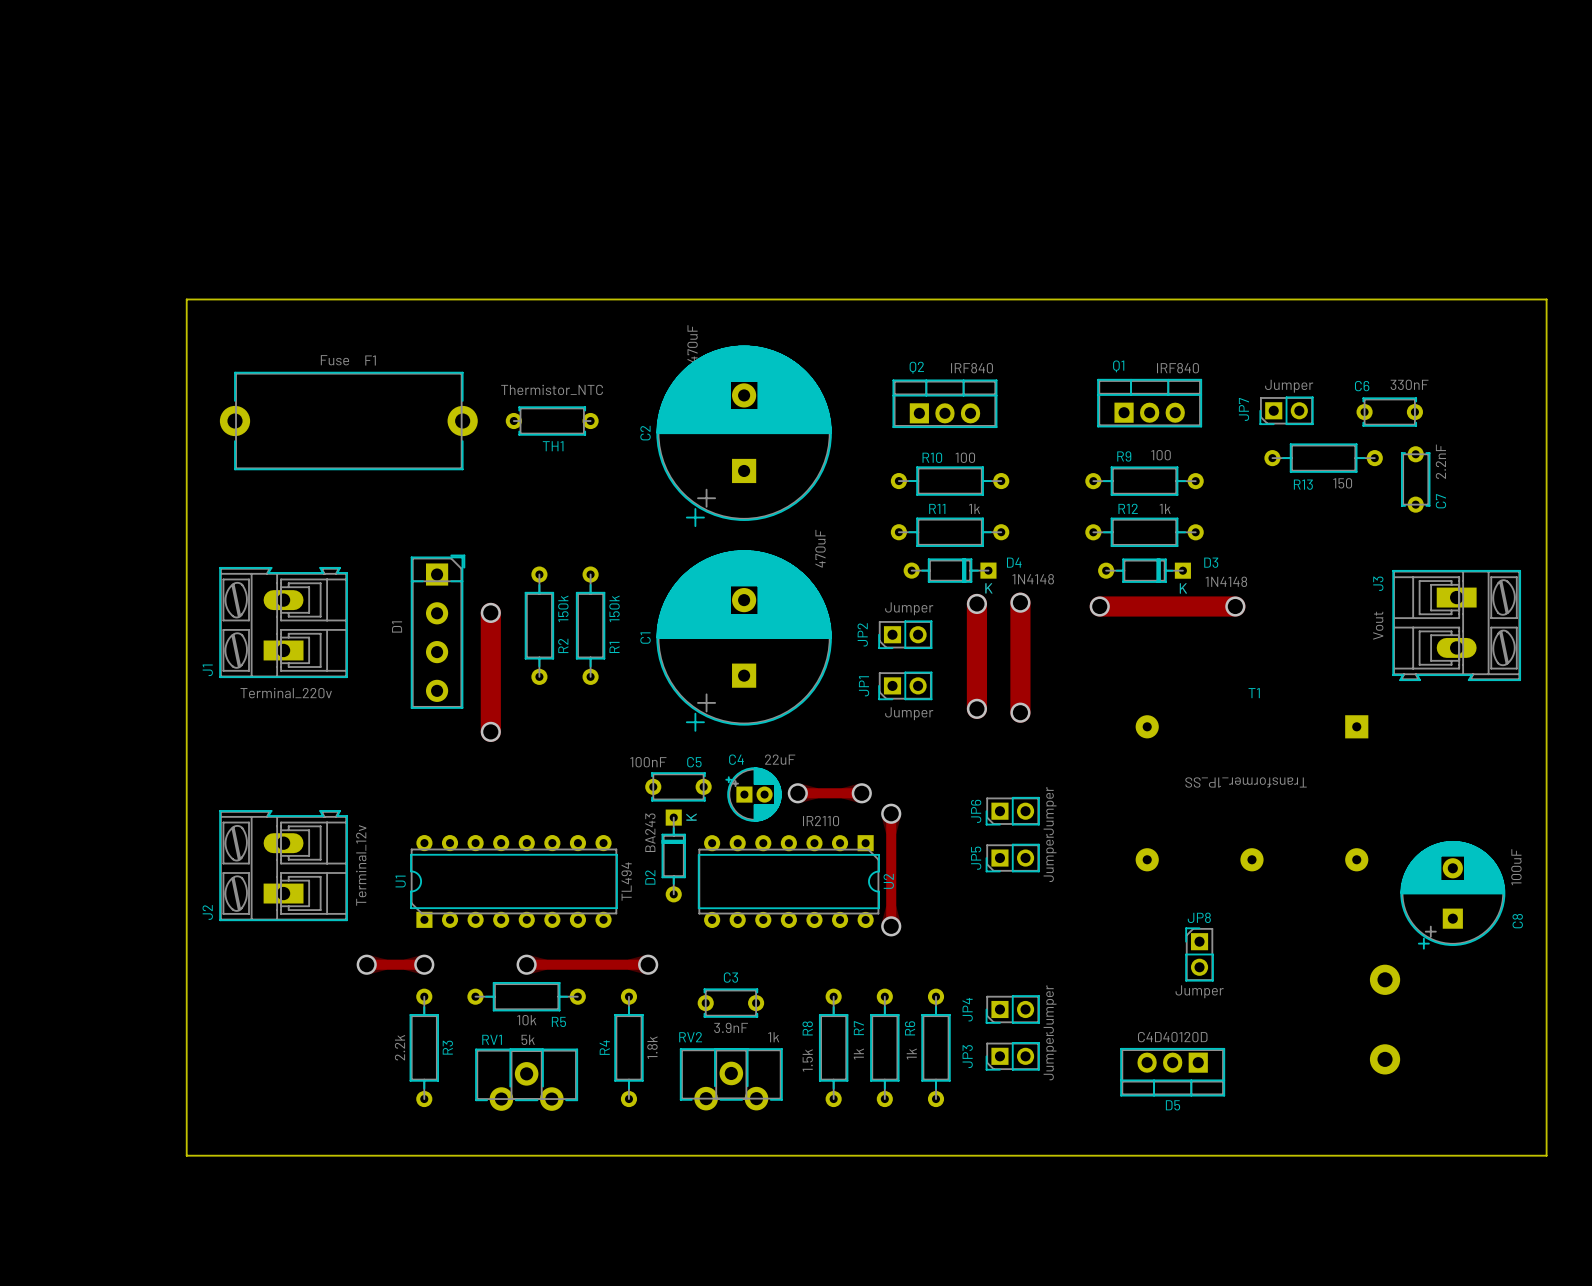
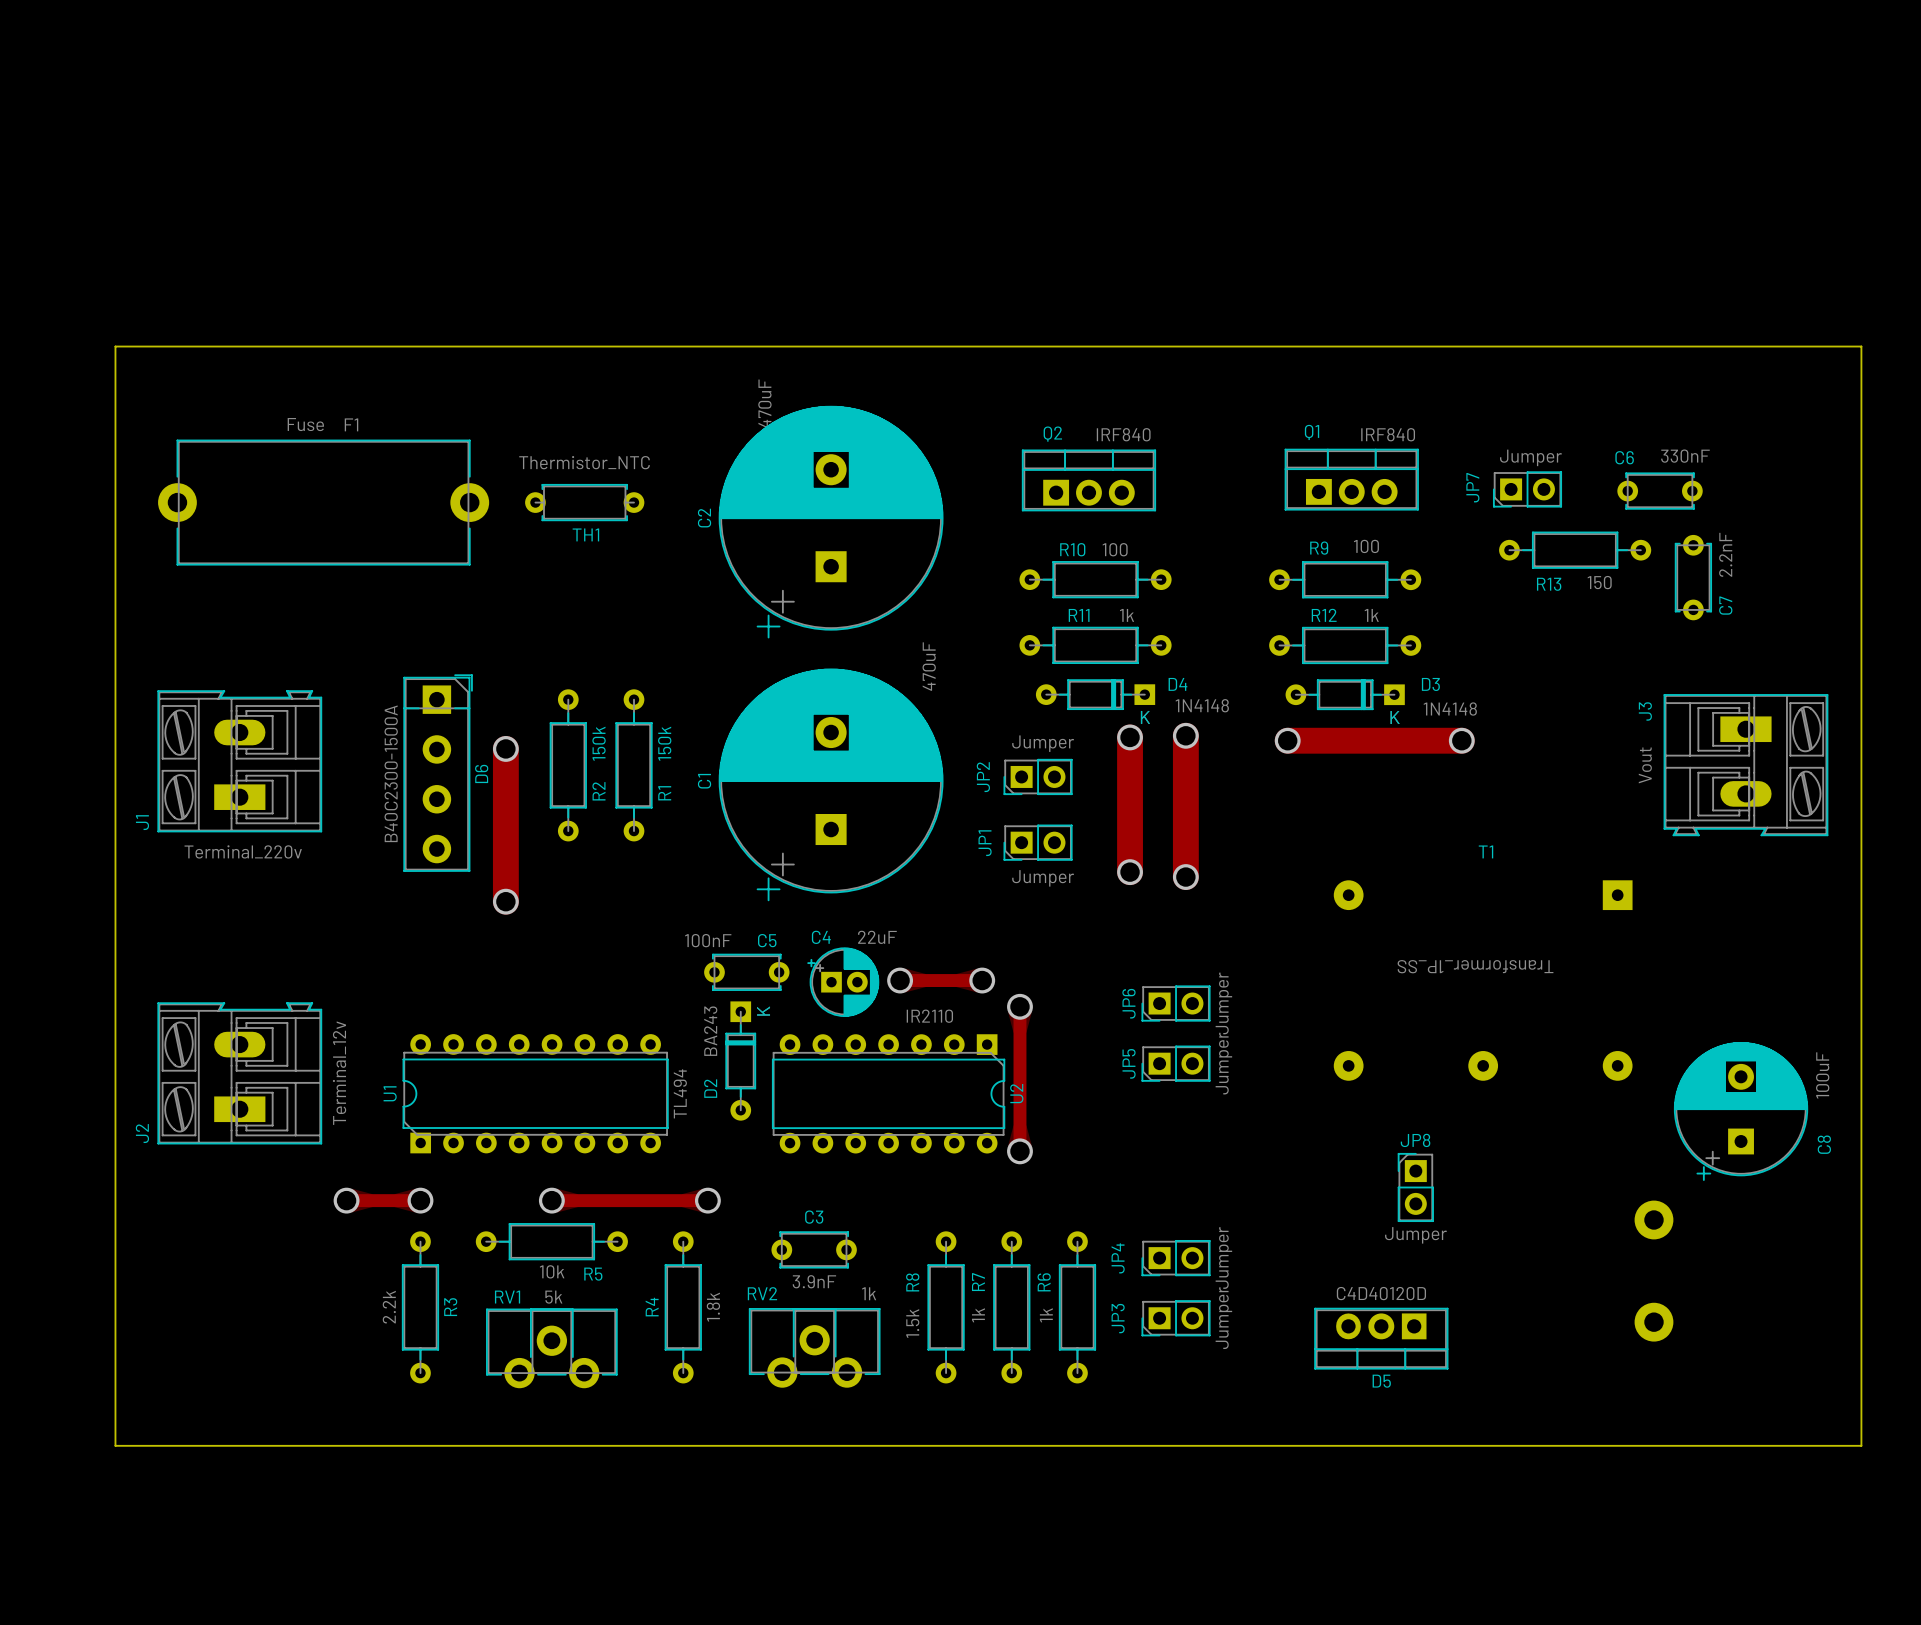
Q2 footprint: [892, 379, 998, 428] -> [1021, 449, 1156, 512]
Q1 footprint: [1097, 379, 1202, 428] -> [1284, 448, 1419, 511]
D1 name: D1 (397, 626) -> D6 (481, 773)
D1 value: none -> B40C2300-1500A (391, 773)
D5 footprint: [1120, 1048, 1225, 1097] -> [1314, 1307, 1449, 1370]

